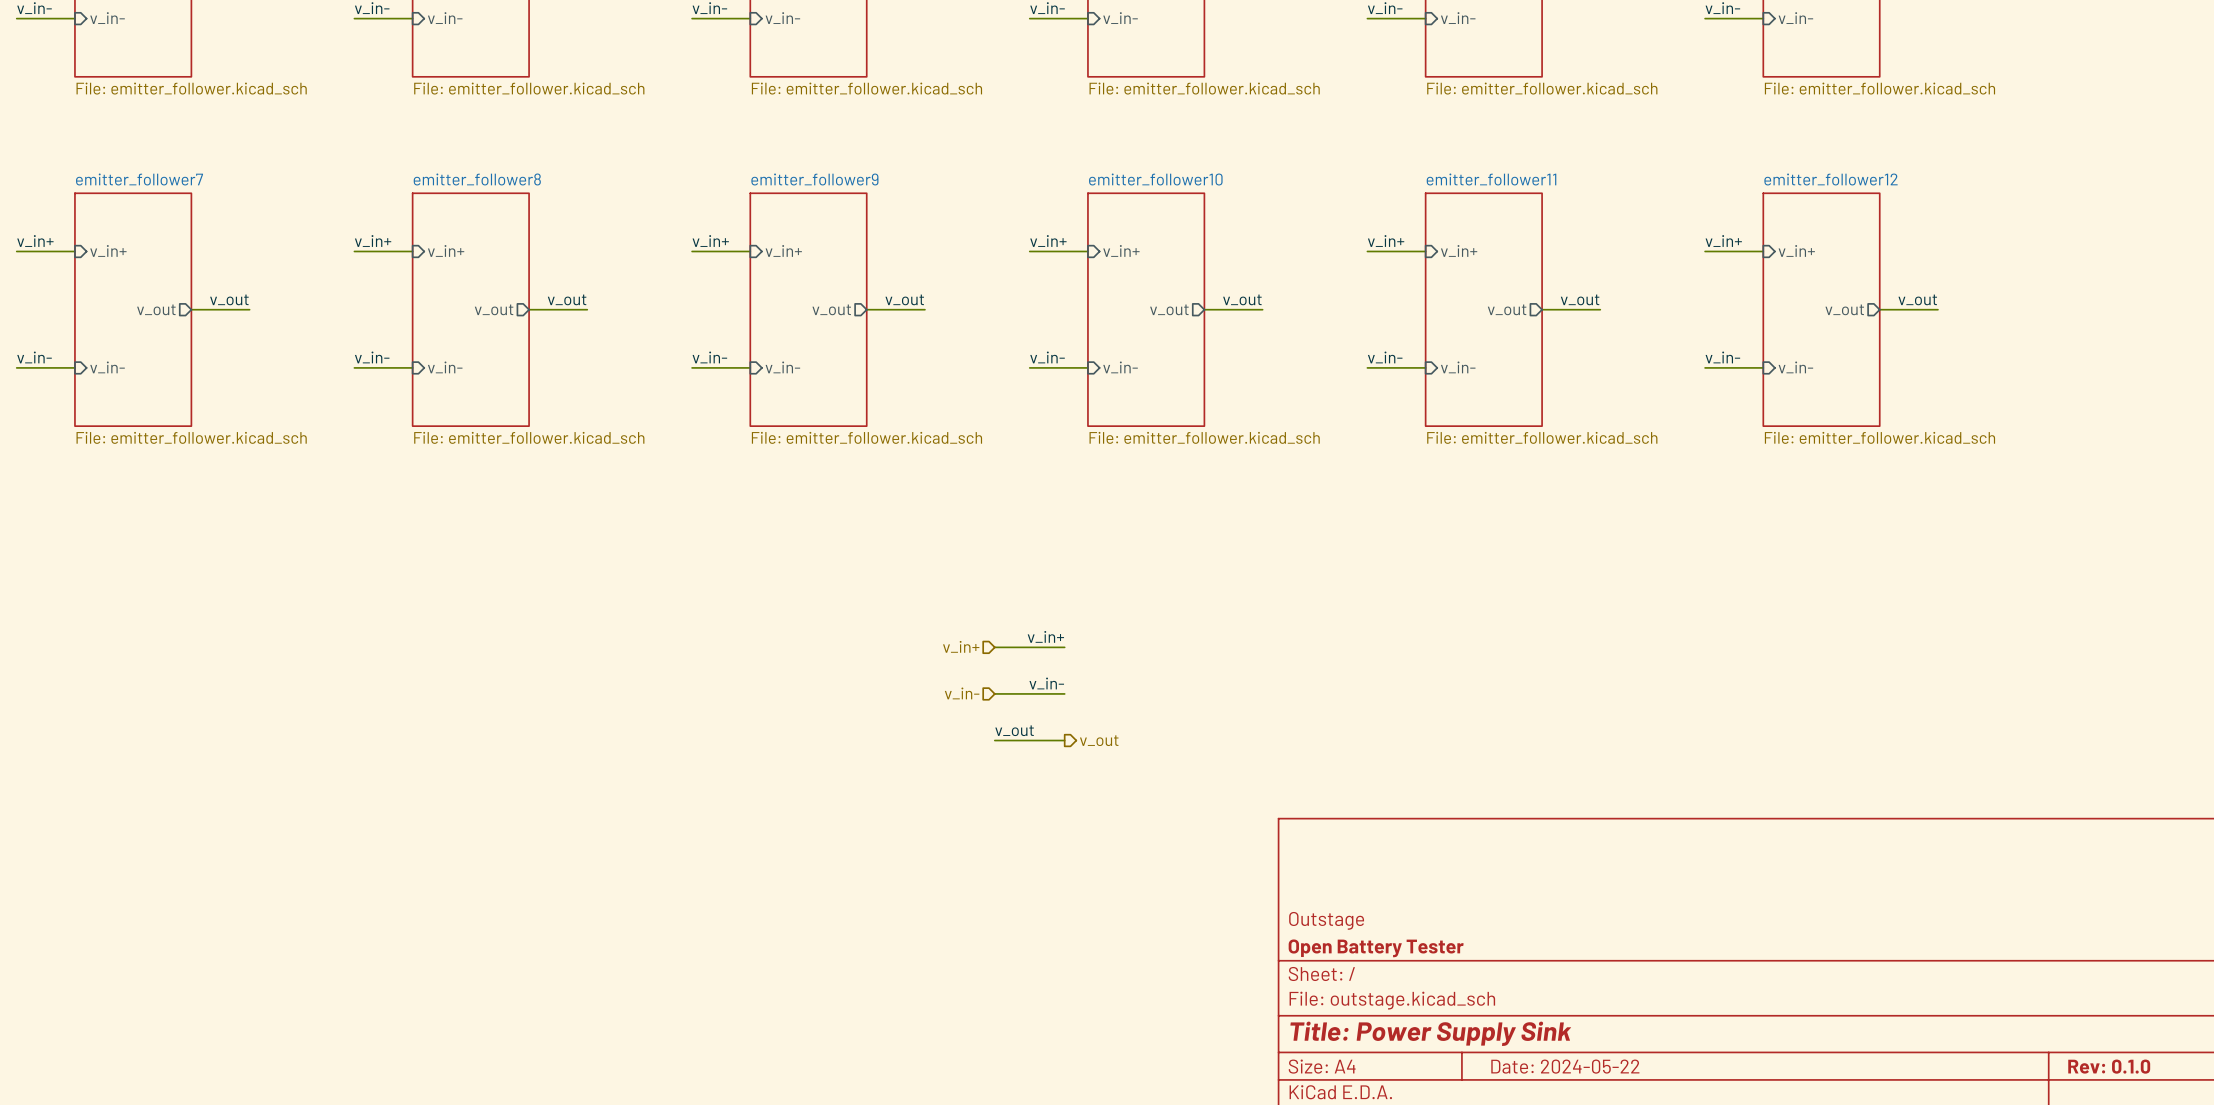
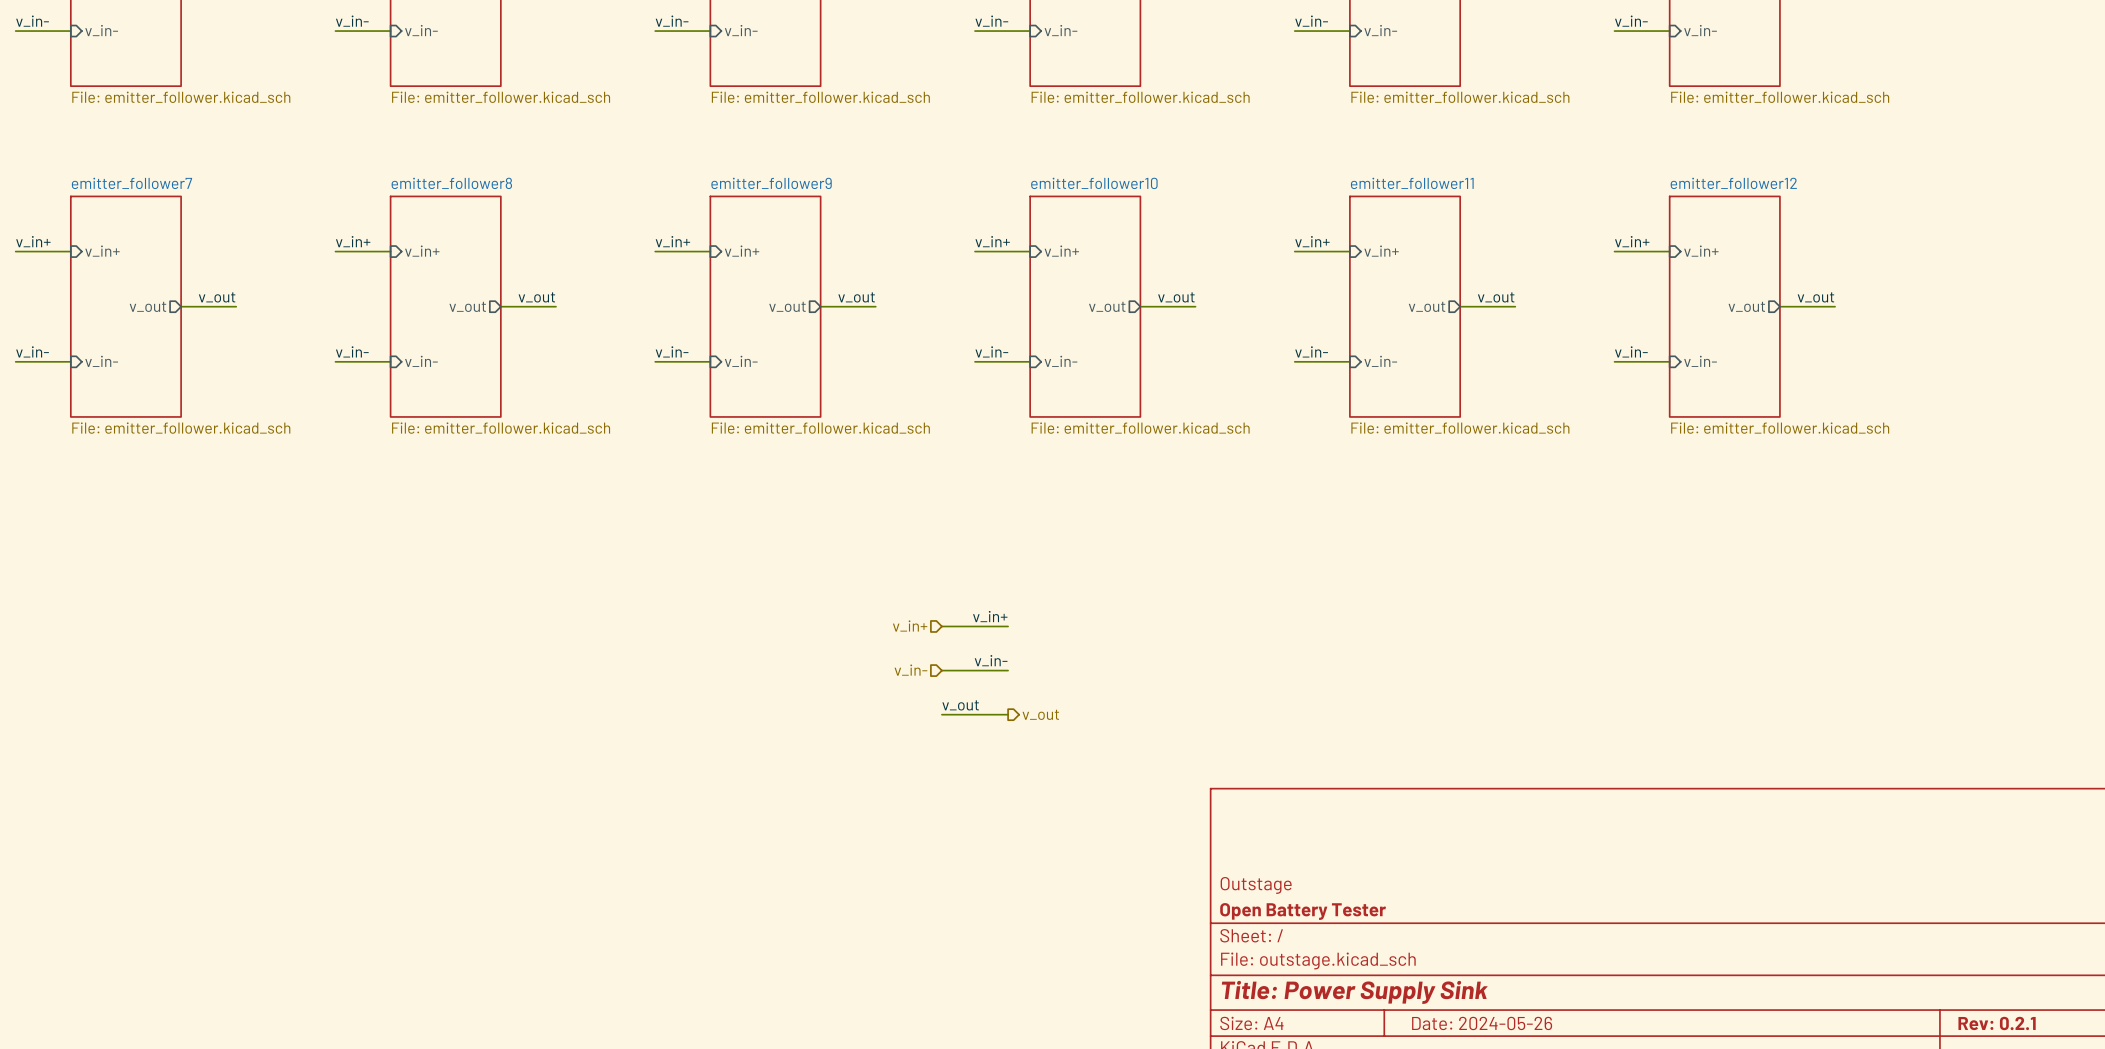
title block: Date: 2024-05-22 (1565, 1066) -> Date: 2024-05-26 (1482, 1023)
title block: Rev: 0.1.0 (2109, 1066) -> Rev: 0.2.1 (1997, 1023)

